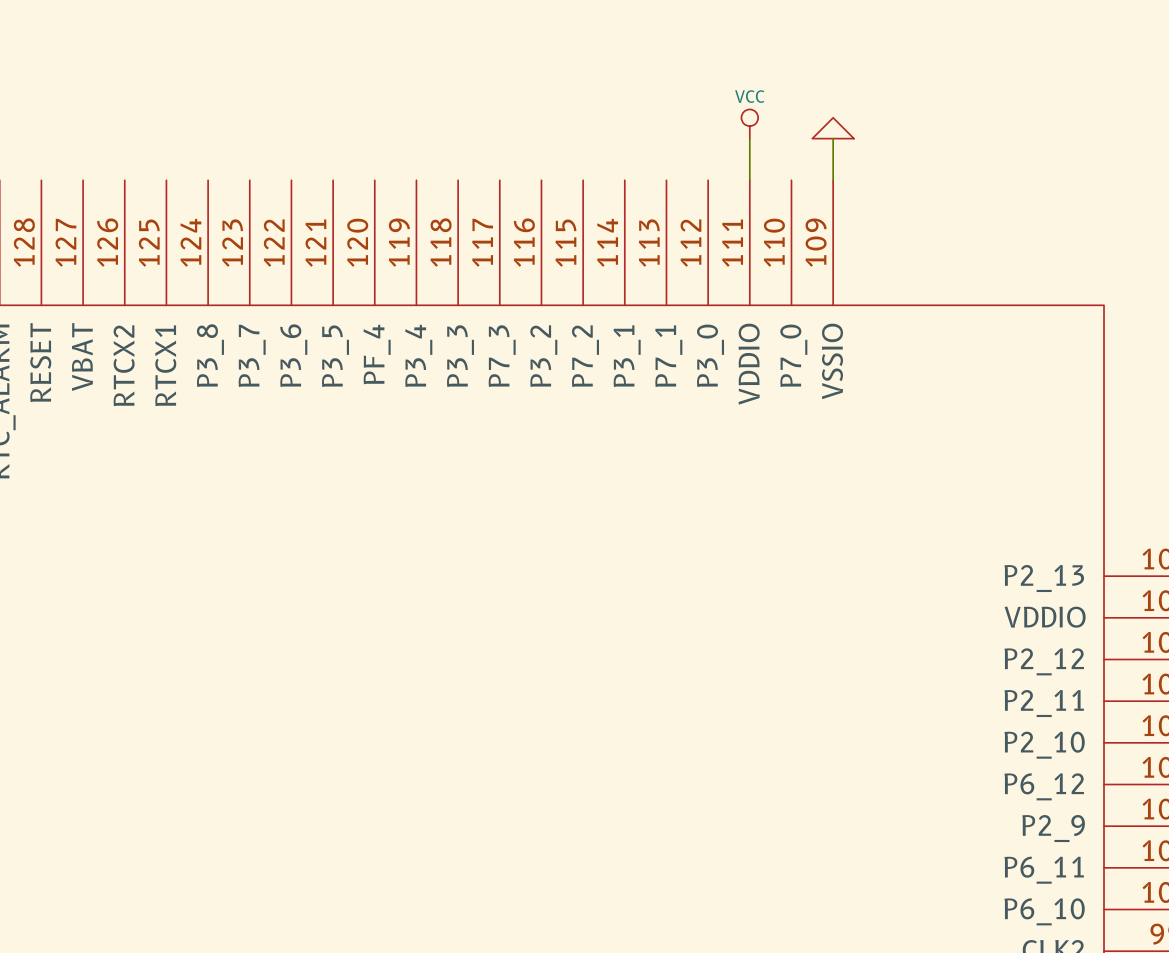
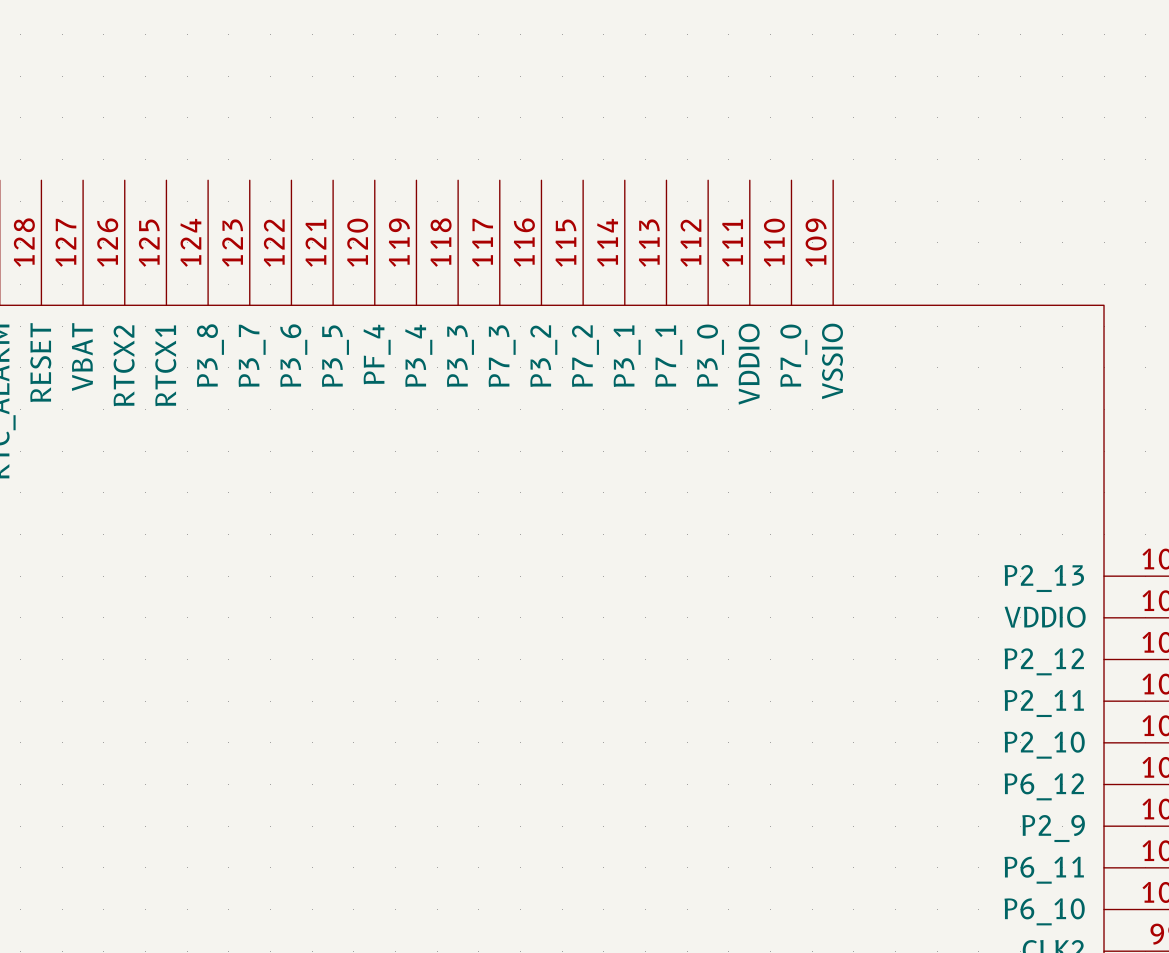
power symbol: VCC (749, 124) -> none
power symbol: (833, 128) -> none
wire: (749, 138) (749, 180) -> none
wire: (833, 138) (833, 180) -> none

